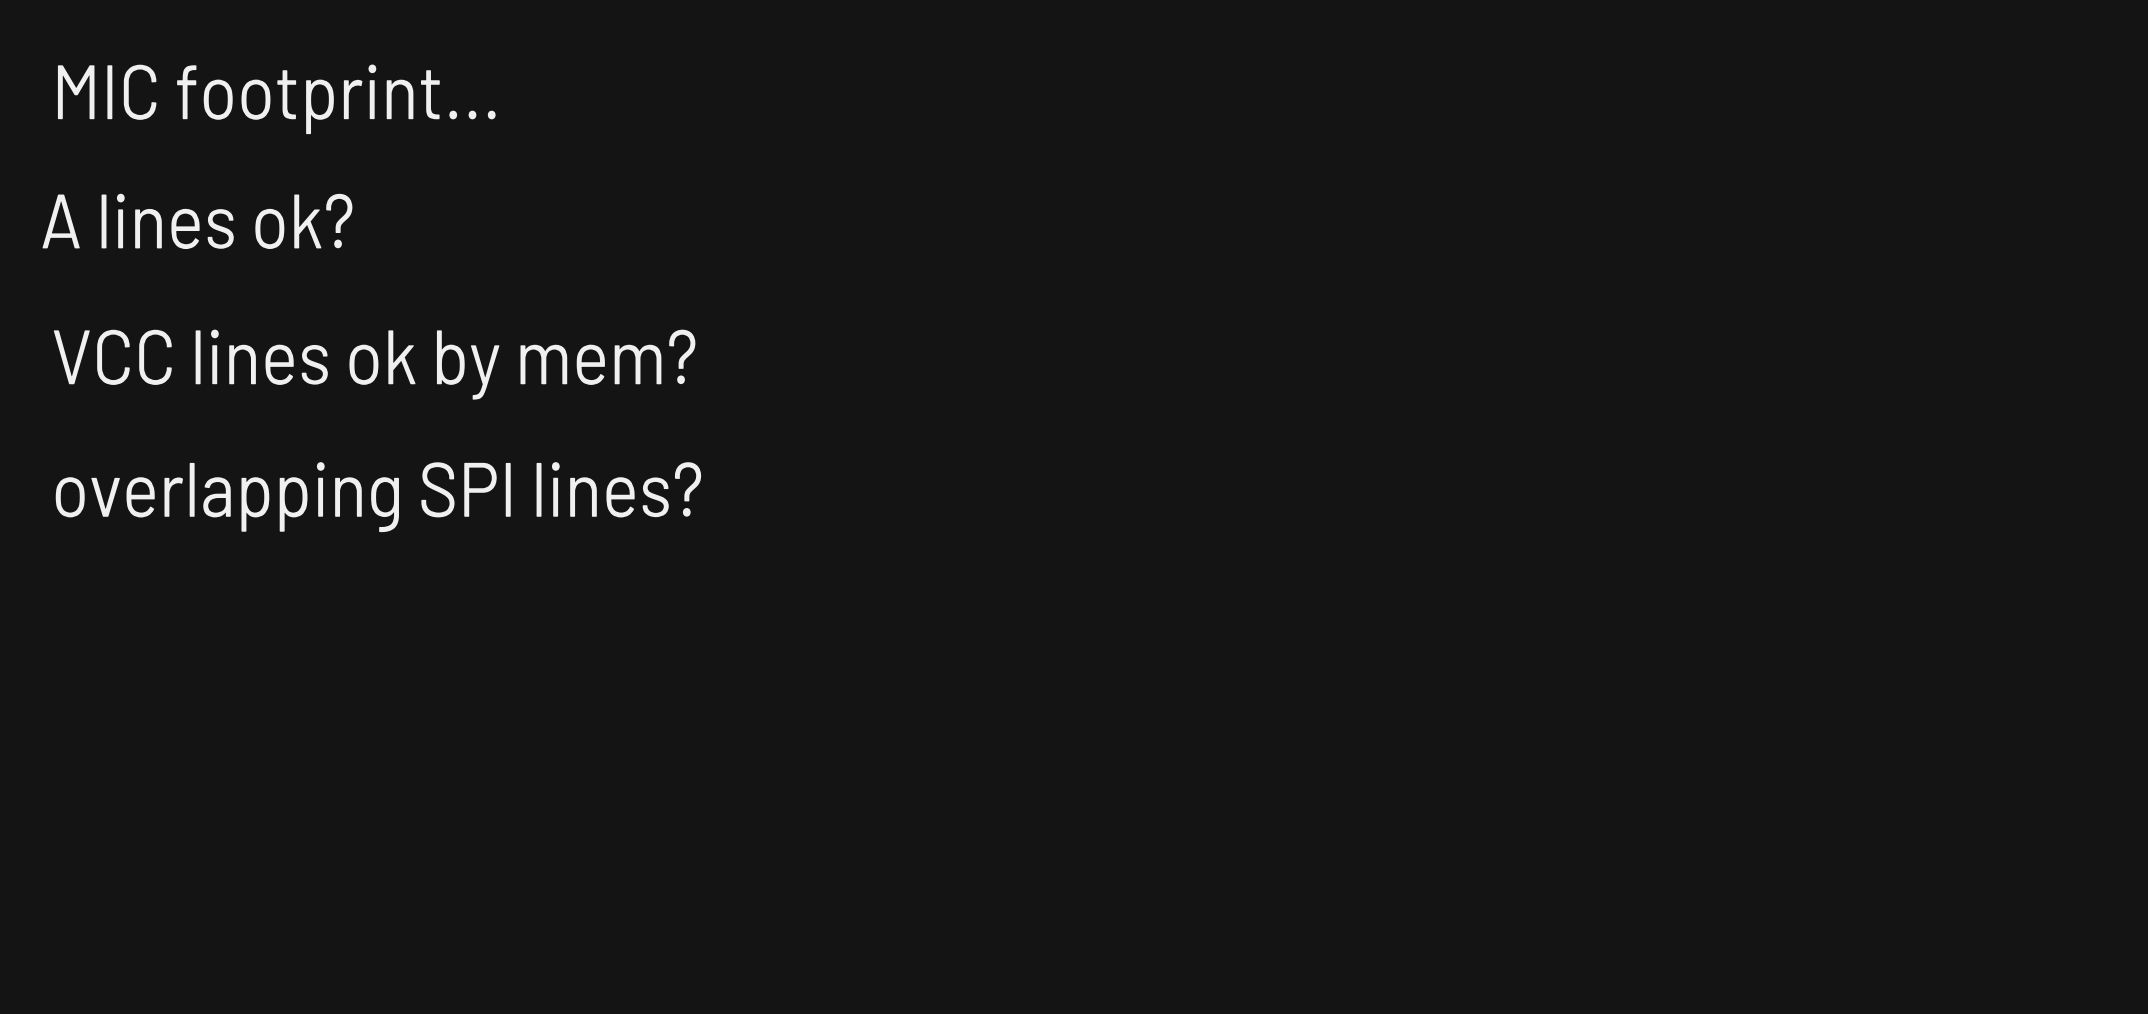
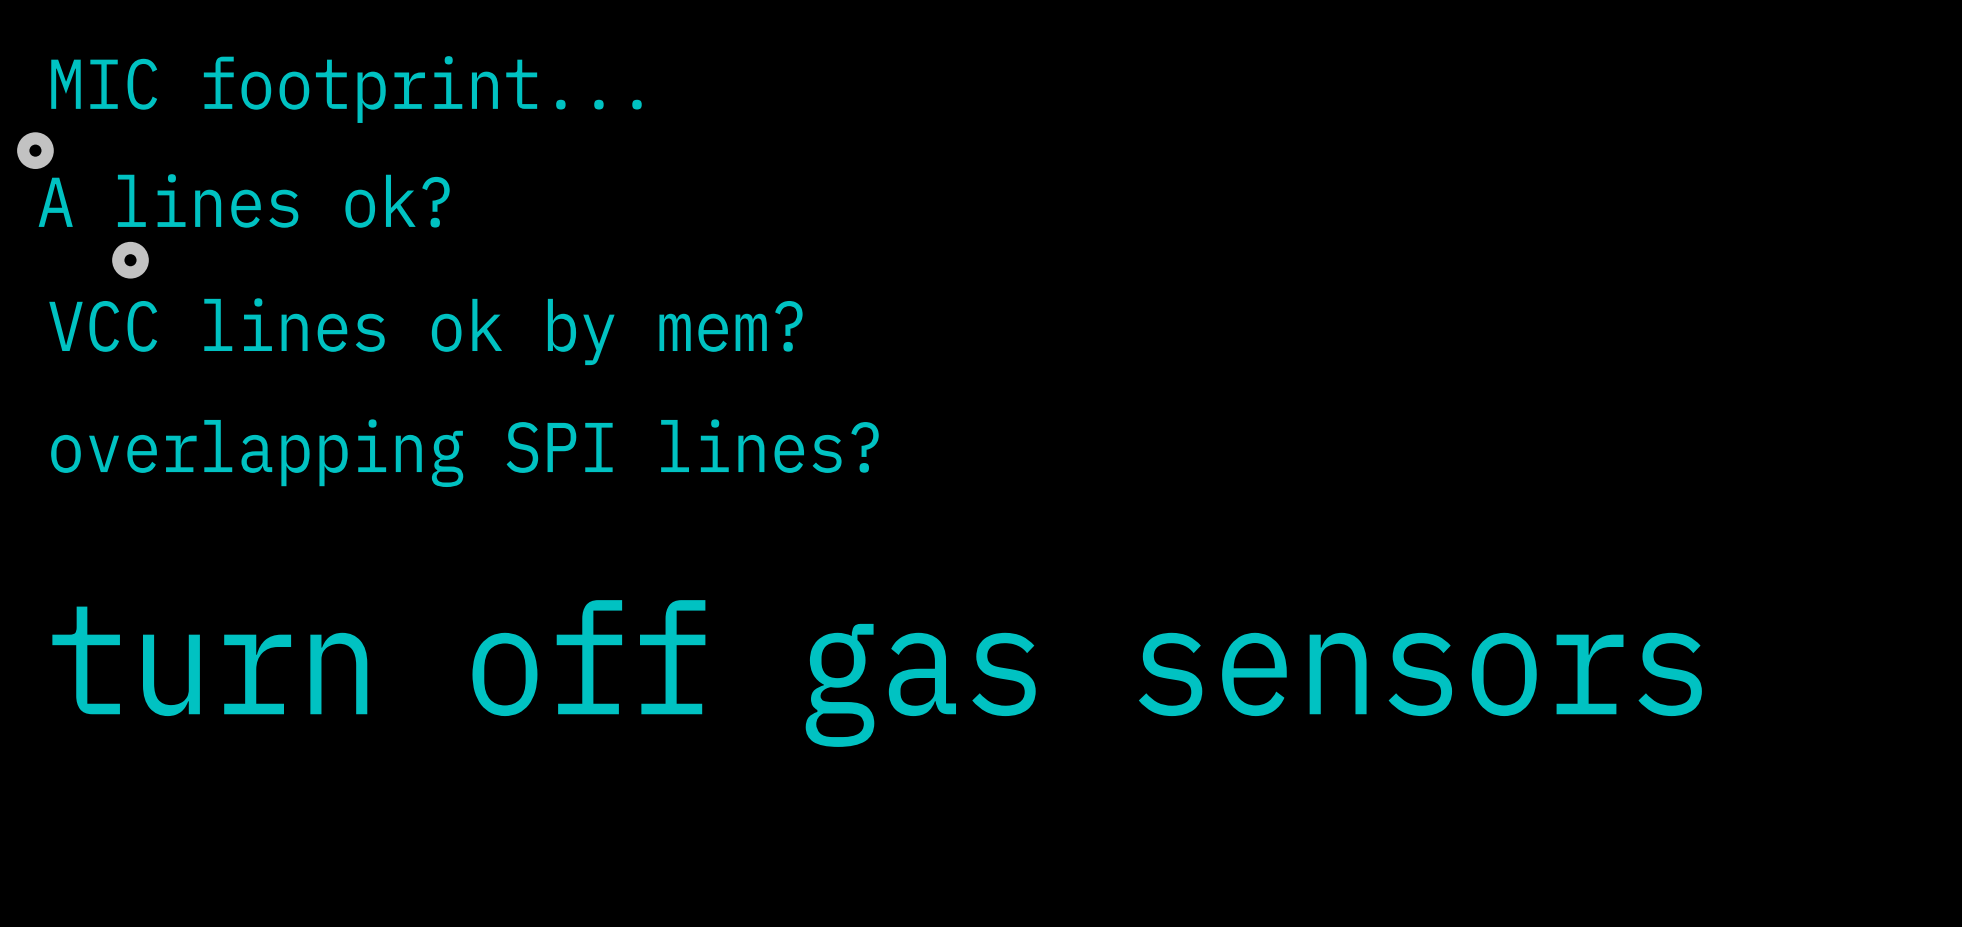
via: none -> (35, 150)
via: none -> (130, 260)
text: none -> turn off gas sensors (877, 673)

